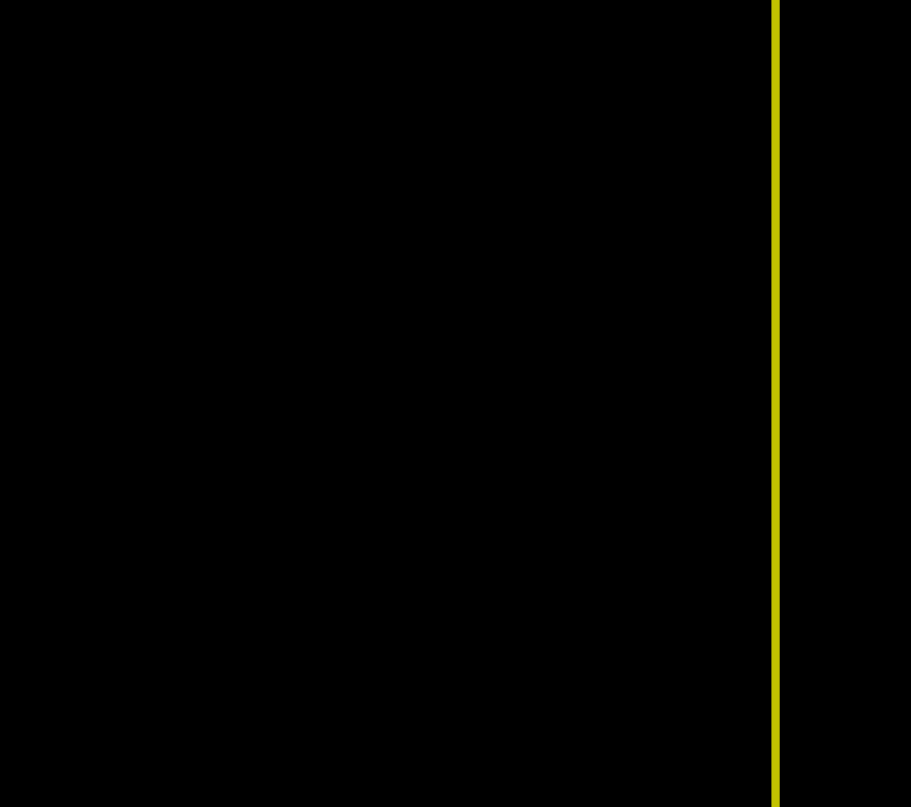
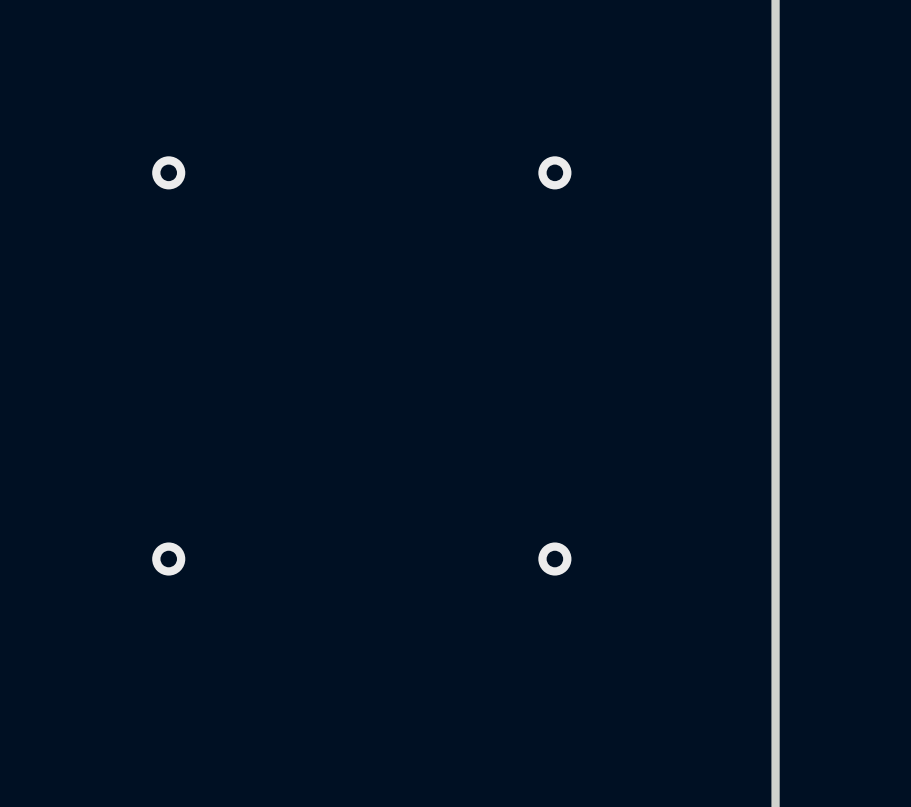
via: none -> (168, 172)
via: none -> (554, 172)
via: none -> (168, 559)
via: none -> (554, 559)

